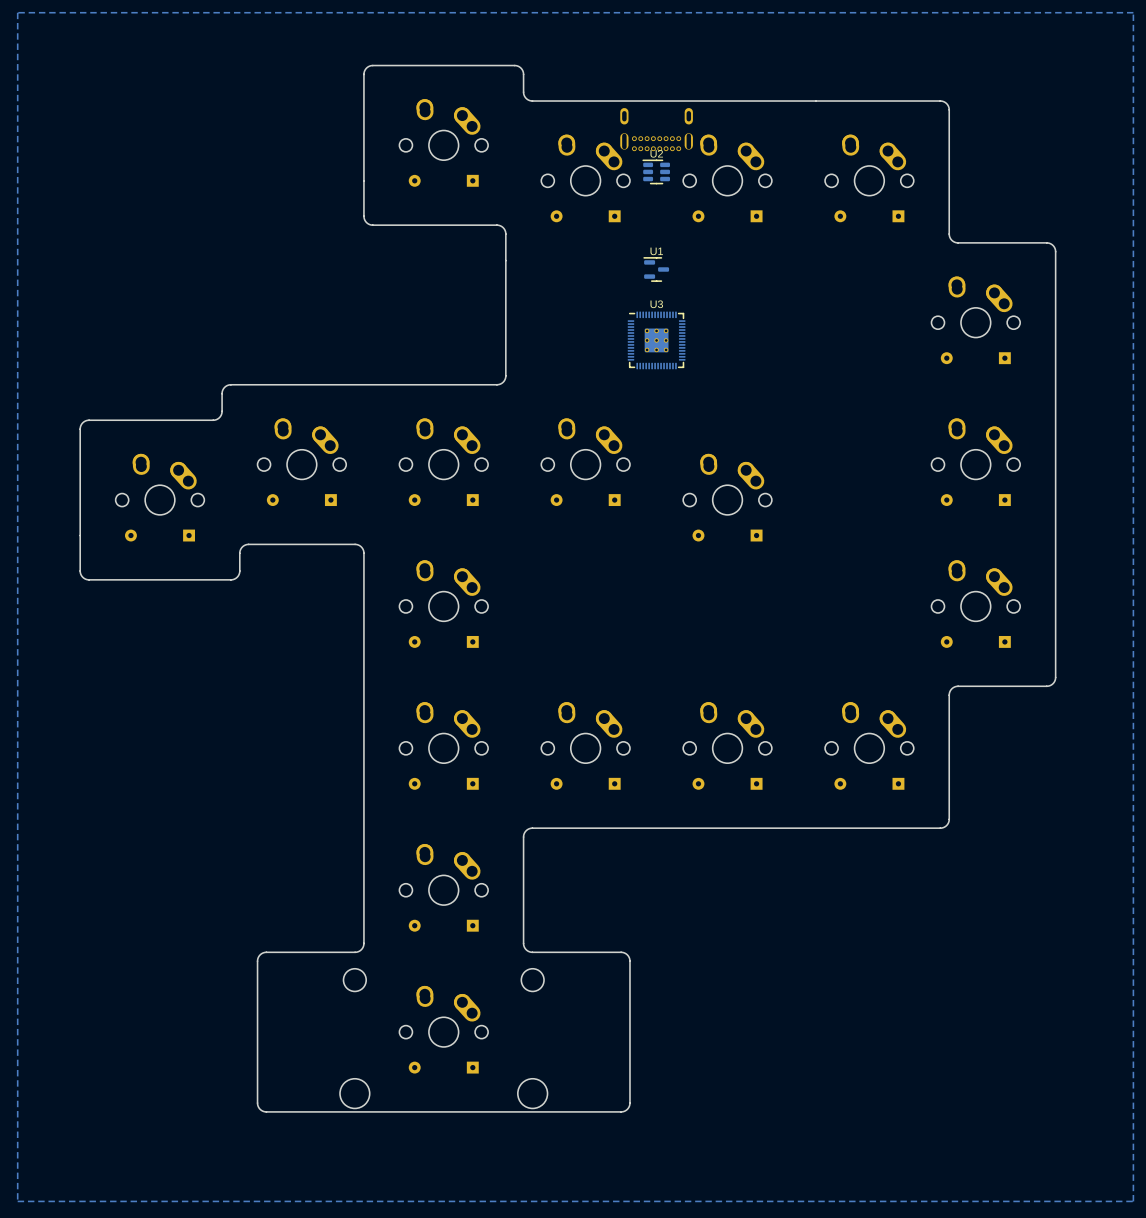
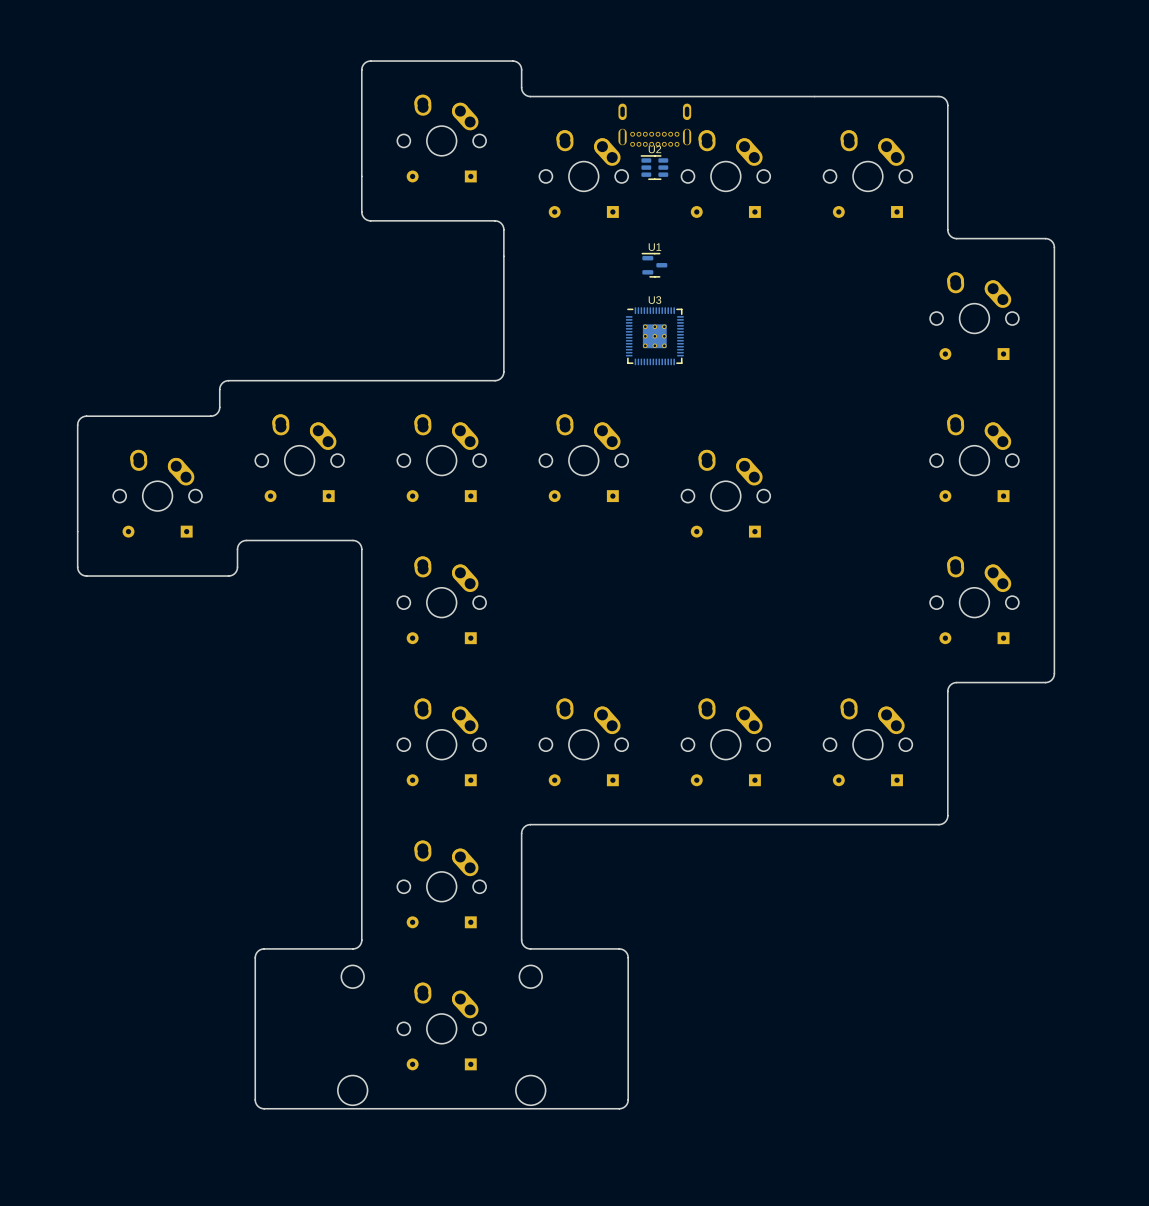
zone outline: (1133, 12) (17, 12) (17, 1201) (1133, 1201) (1133, 12) -> none

